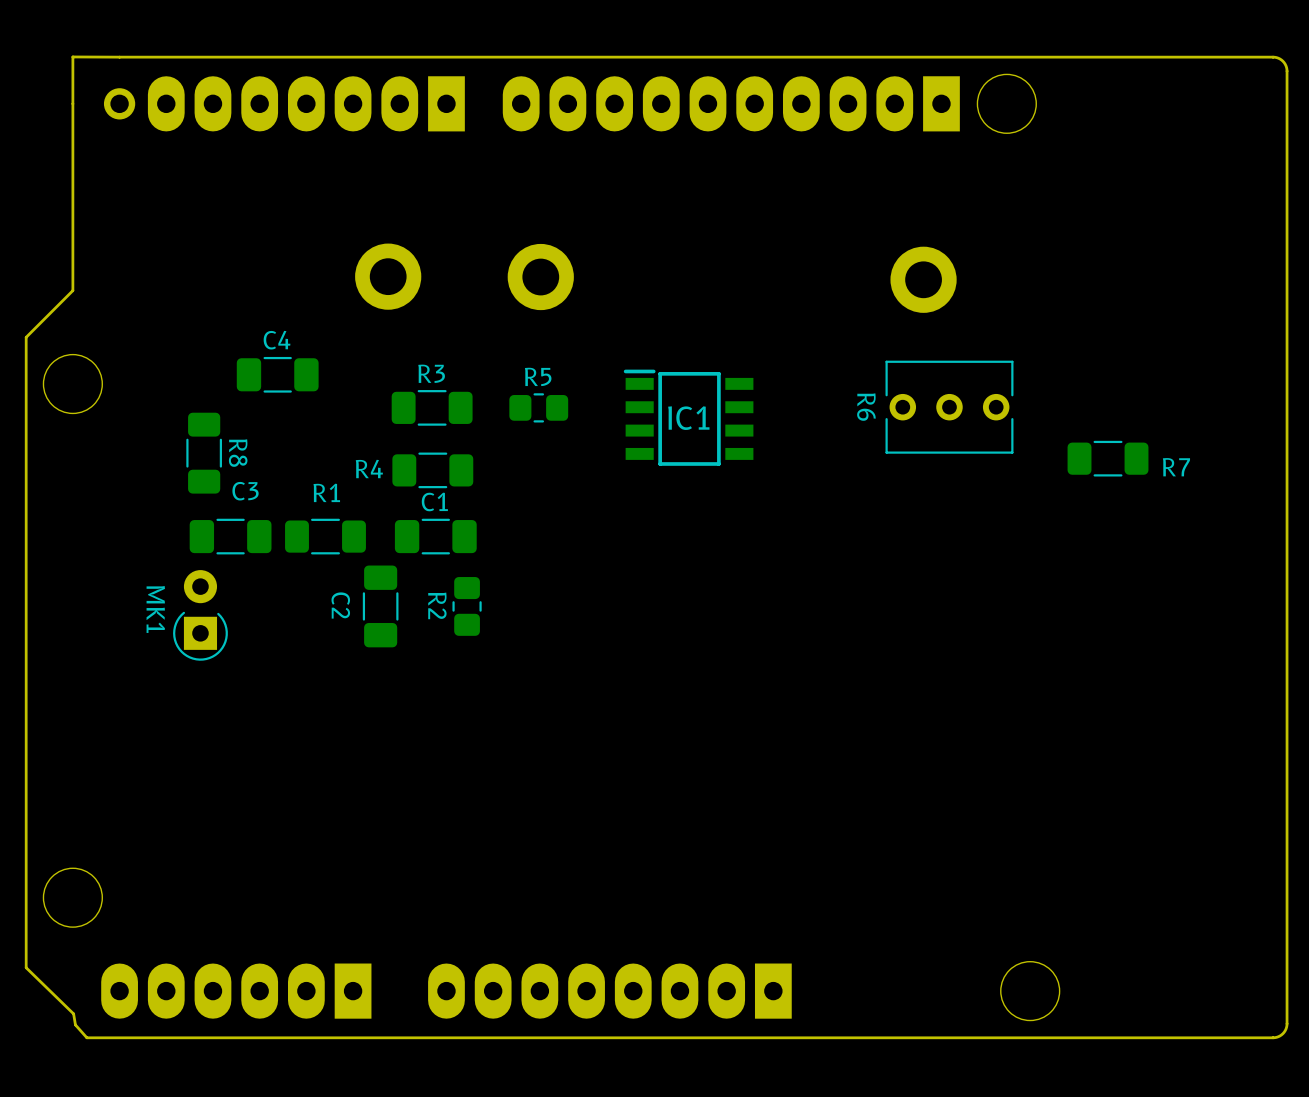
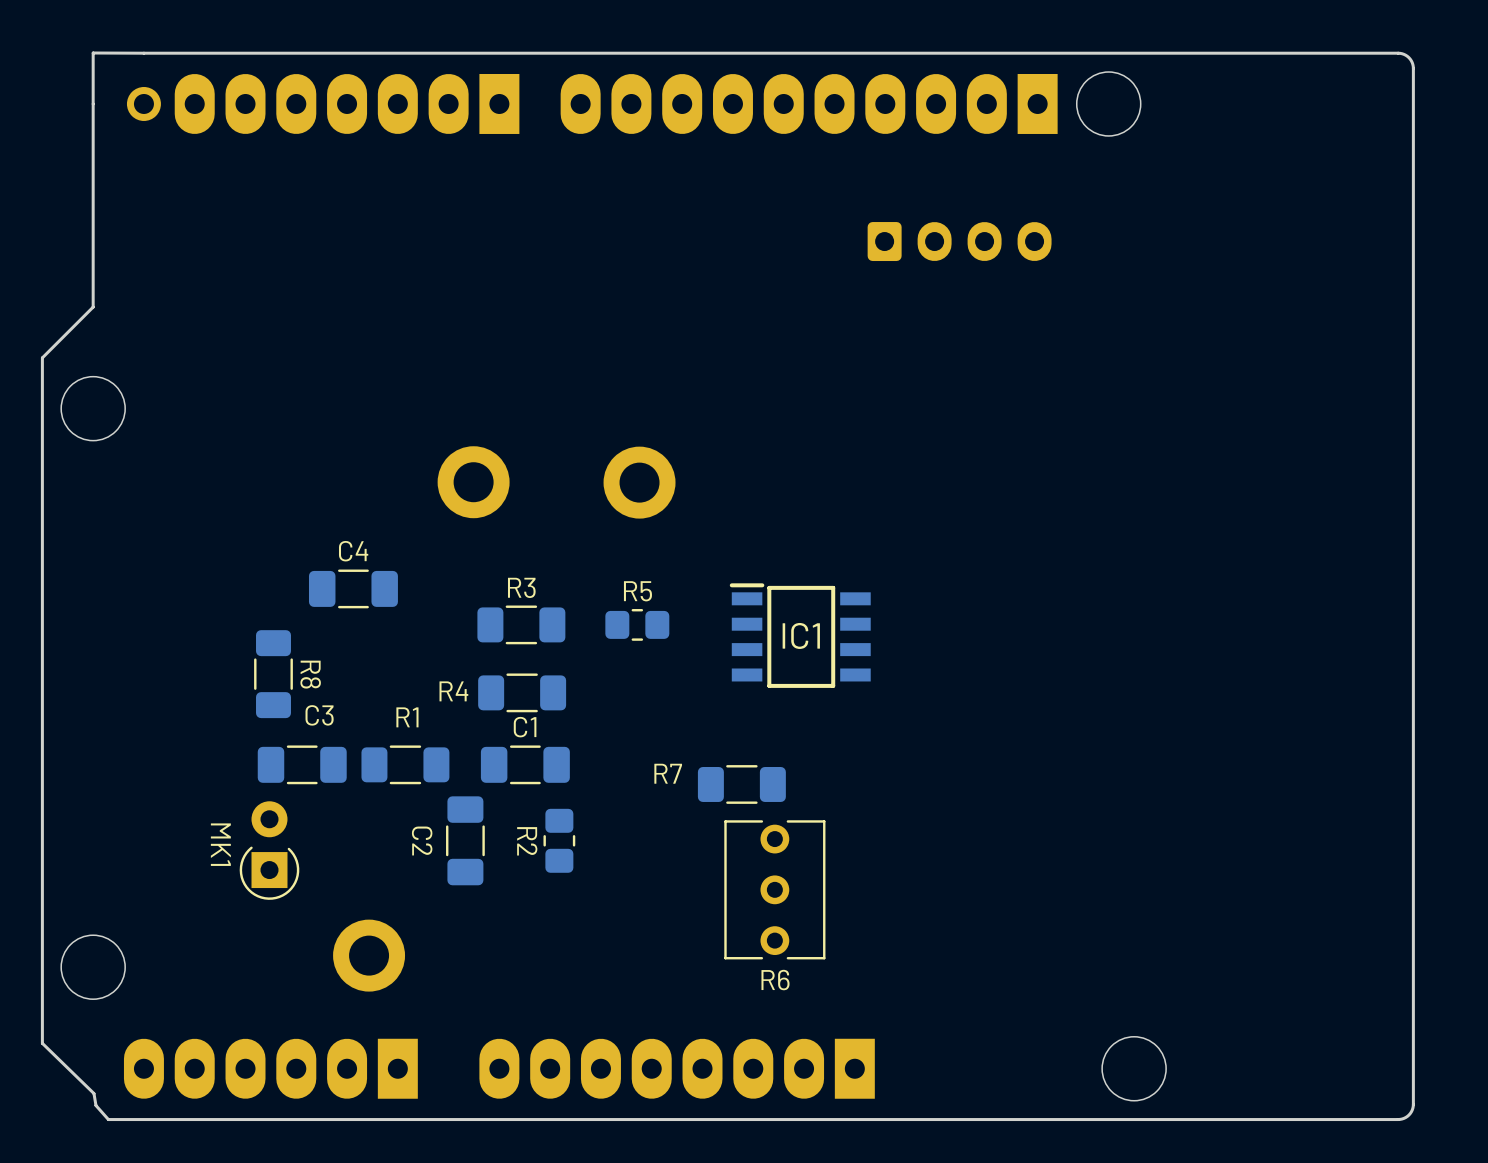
part: none -> (959, 241)
part: (388, 276) -> none
part: (540, 277) -> none
part: (923, 279) -> none
C4 position: (277, 374) -> (353, 588)
R3 position: (432, 407) -> (521, 624)
R5 position: (538, 407) -> (637, 624)
R6 name position: R6 (866, 407) -> R6 (775, 980)
R6 rotation: 0° (949, 407) -> 90° clockwise (774, 889)
R6 position: (949, 407) -> (774, 889)
IC1 position: (688, 417) -> (800, 635)
part: none -> (473, 482)
part: none -> (639, 482)
R8 position: (204, 453) -> (273, 674)
R7 position: (1108, 458) -> (741, 784)
R7 name position: R7 (1176, 467) -> R7 (668, 773)
R4 position: (432, 470) -> (522, 692)
C3 position: (230, 536) -> (302, 764)
R1 position: (325, 536) -> (405, 764)
C1 position: (435, 536) -> (525, 764)
C2 position: (380, 606) -> (465, 840)
R2 position: (467, 606) -> (559, 840)
MK1 position: (200, 615) -> (269, 850)
part: none -> (369, 955)

